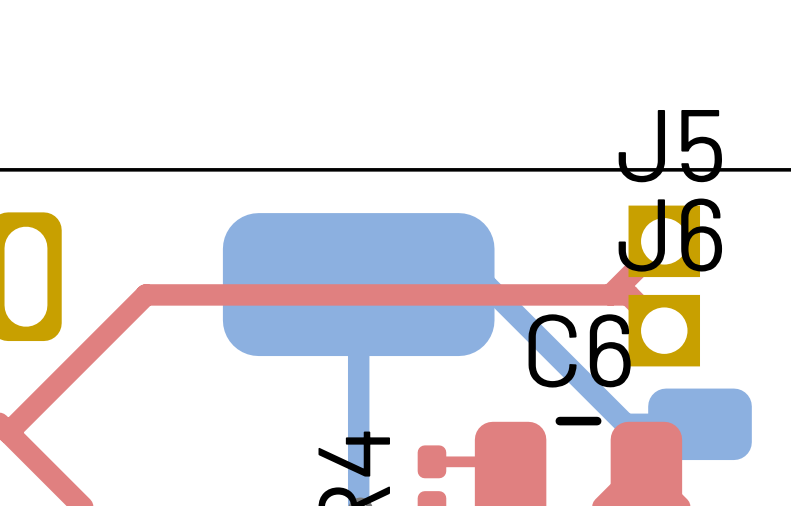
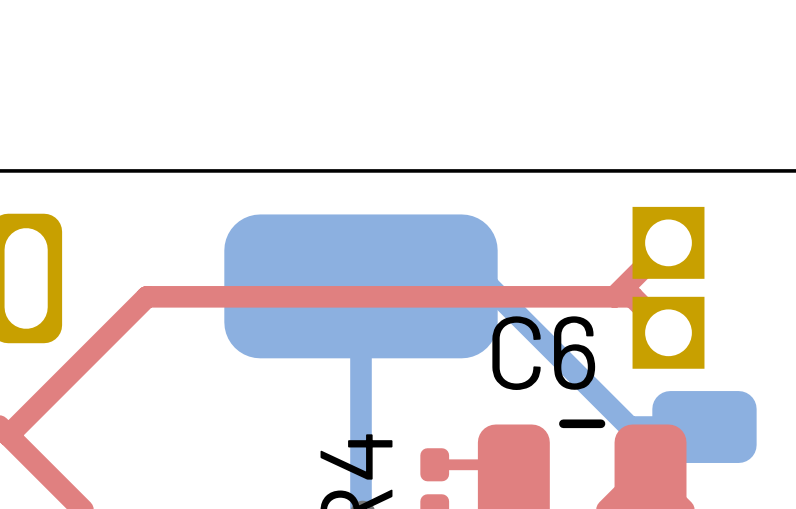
J5 name: J5 (670, 146) -> none
J6 name: J6 (670, 235) -> none
C6 name position: C6 (579, 350) -> C6 (543, 353)

